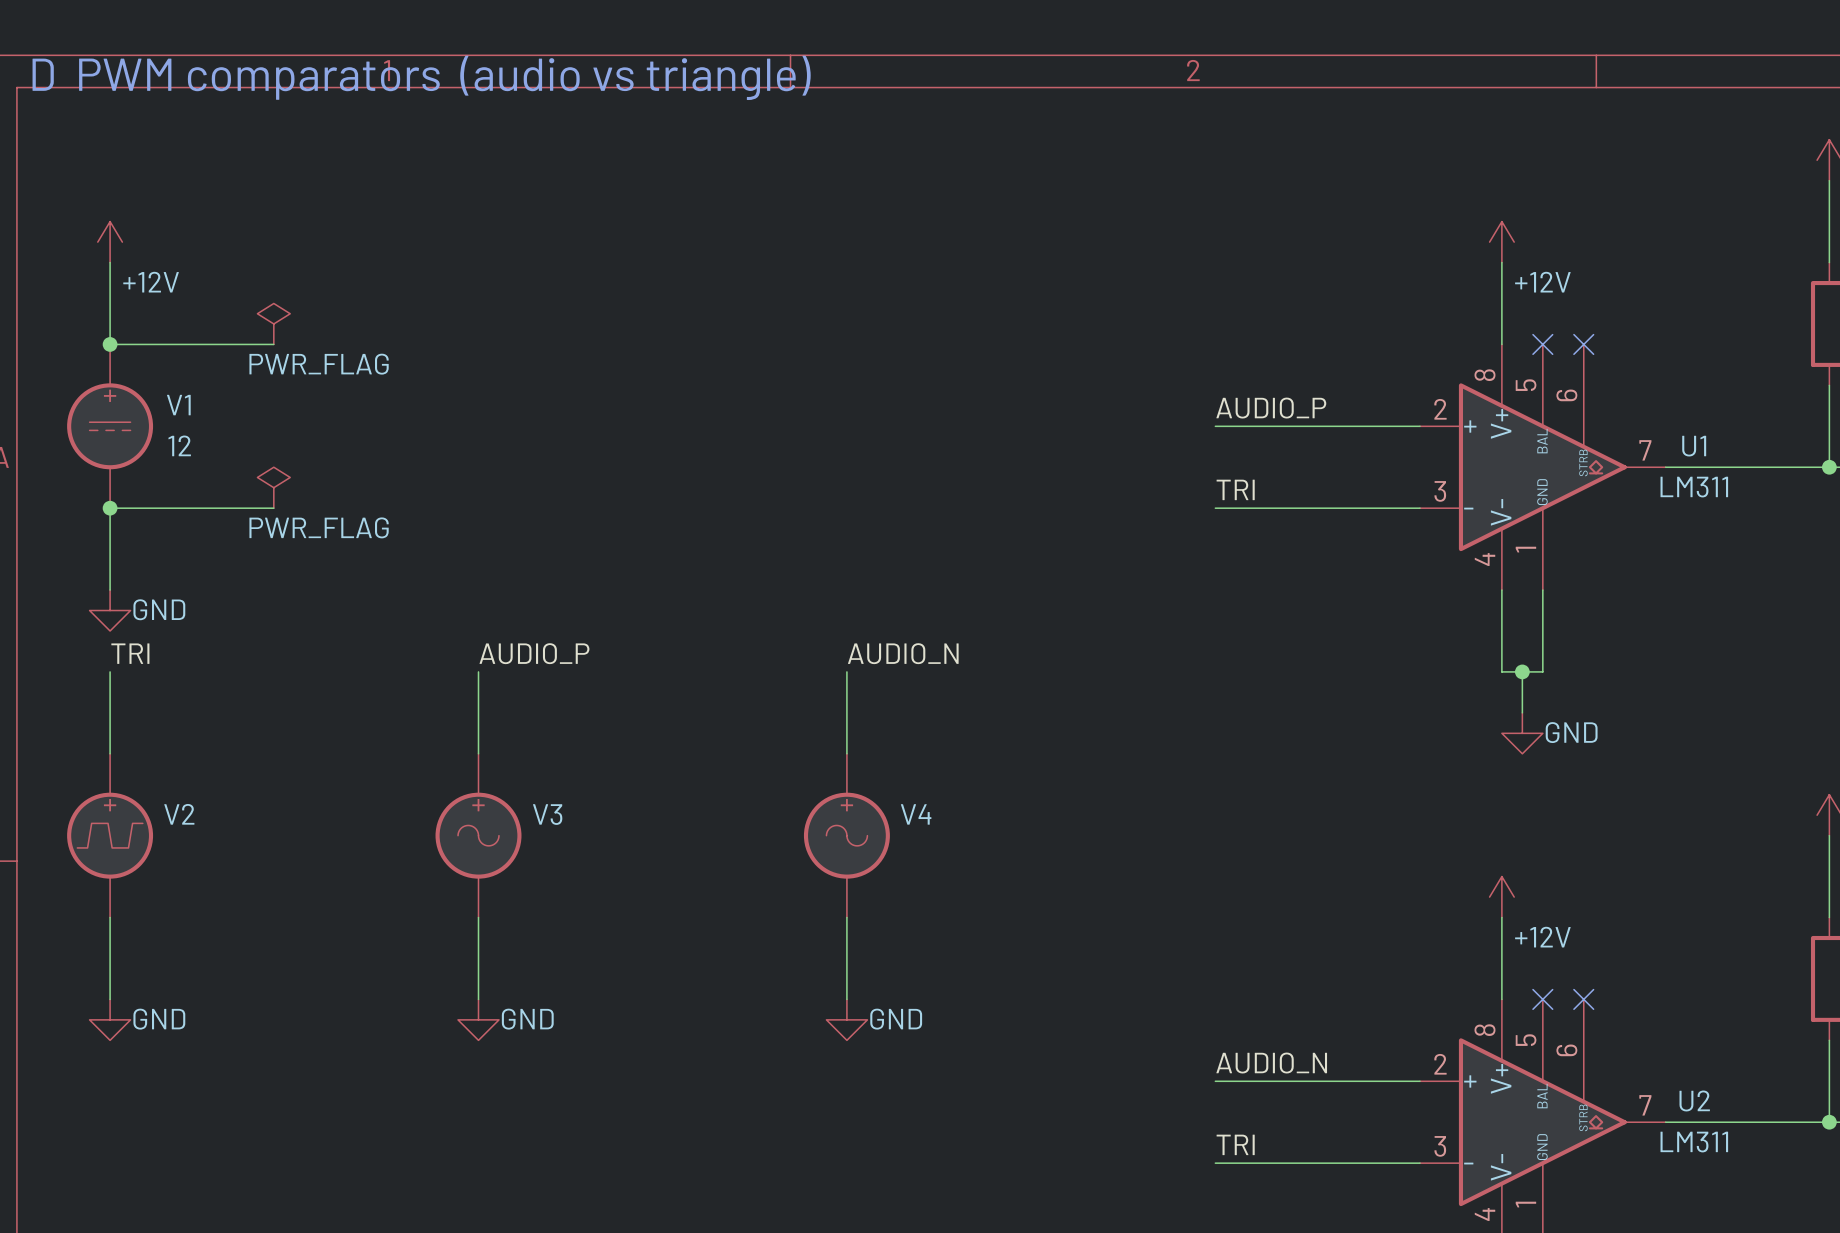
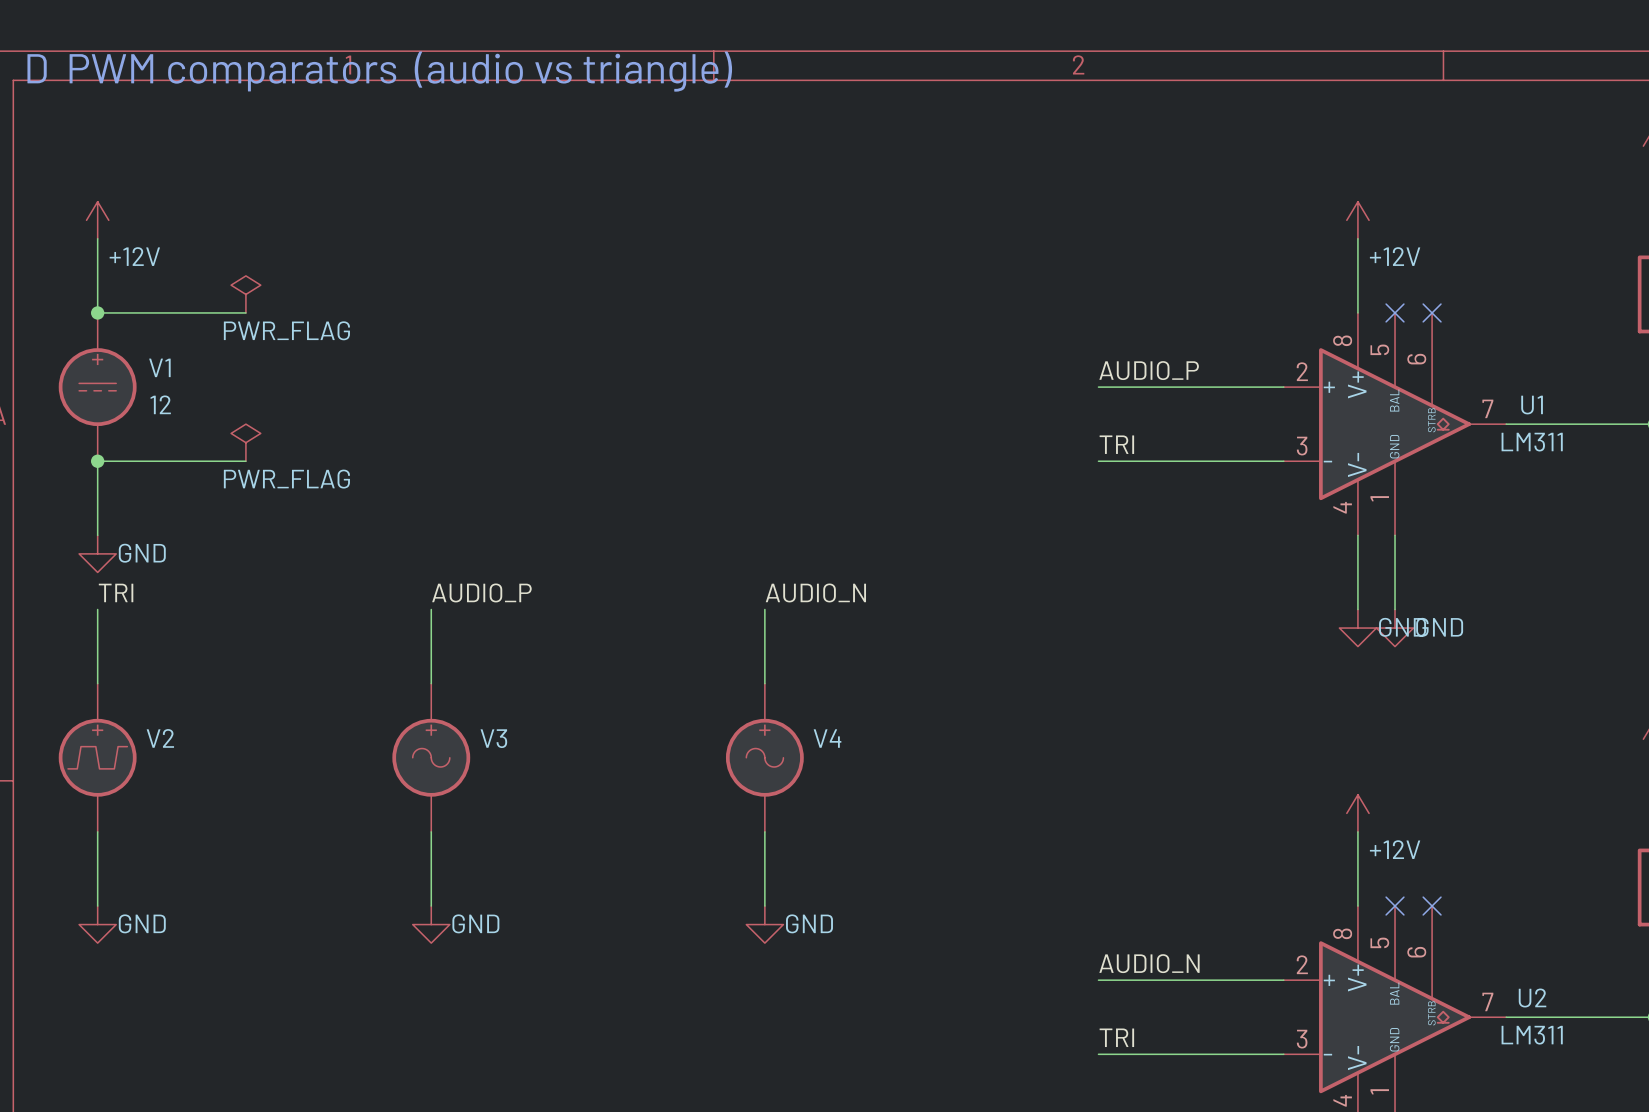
wire: (1501, 671) (1542, 671) -> none
wire: (1522, 671) (1522, 712) -> none
junction: (1522, 671) -> none
power symbol: none -> GND (1357, 628)
power symbol: none -> GND (1395, 628)
power symbol: GND (1522, 733) -> none

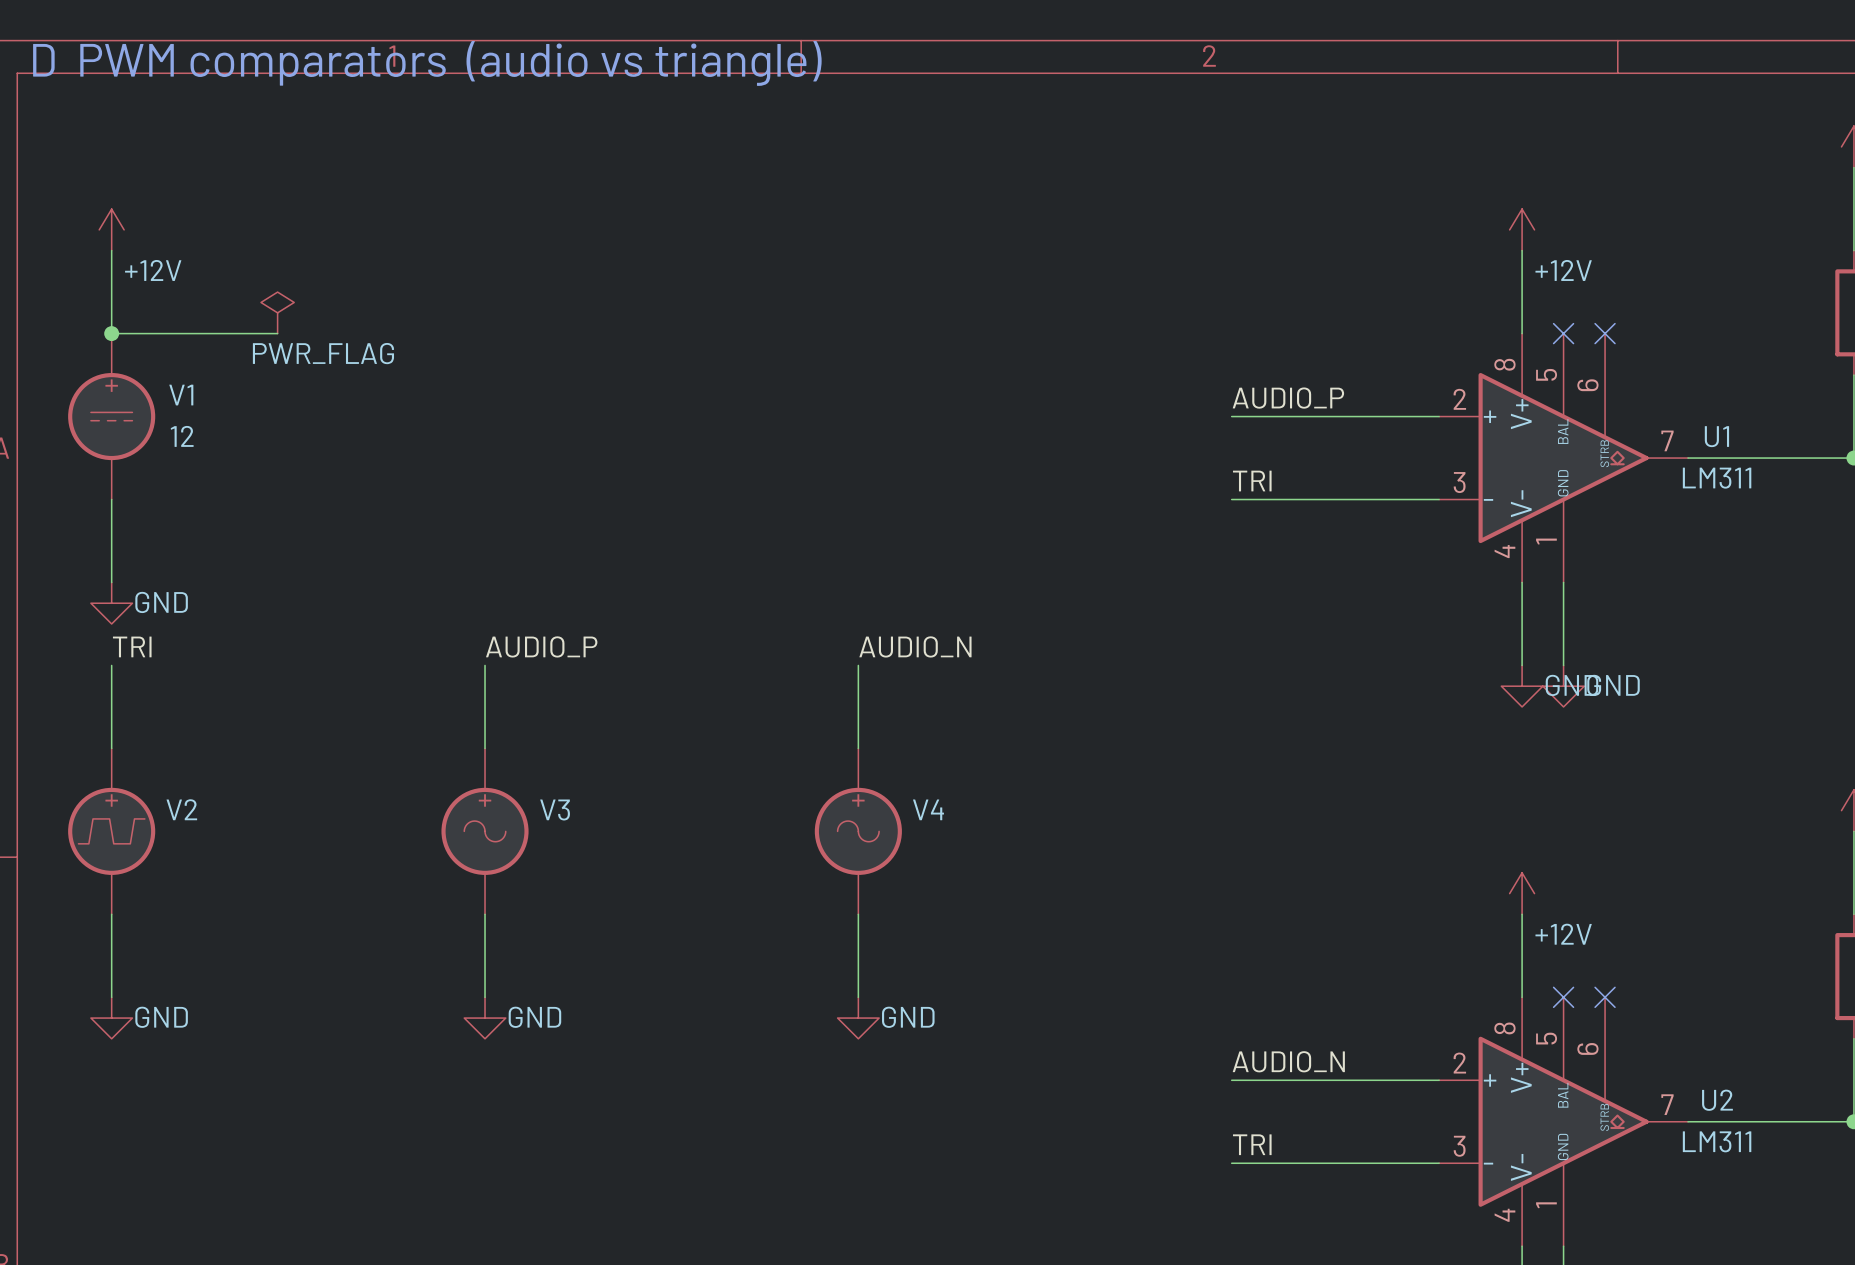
power symbol: PWR_FLAG (245, 442) -> none
wire: (97, 461) (245, 461) -> none
junction: (97, 461) -> none

